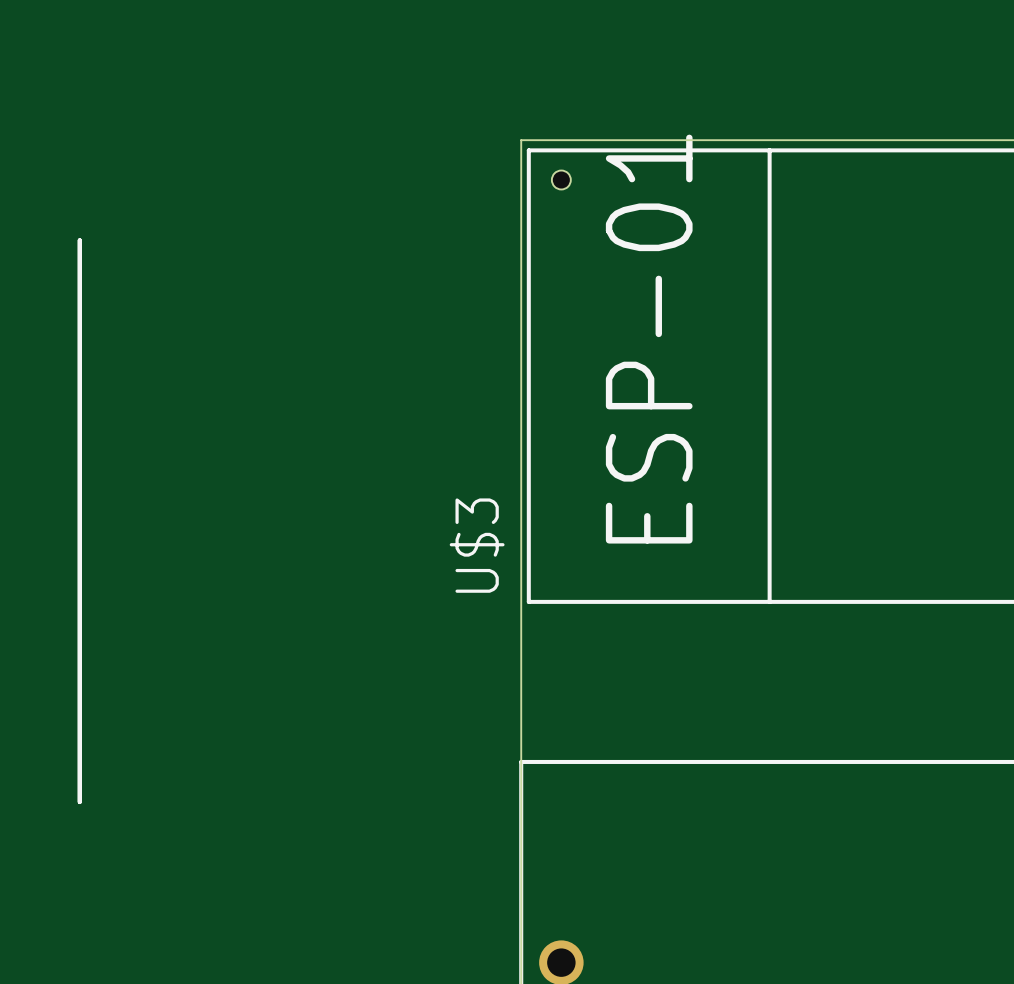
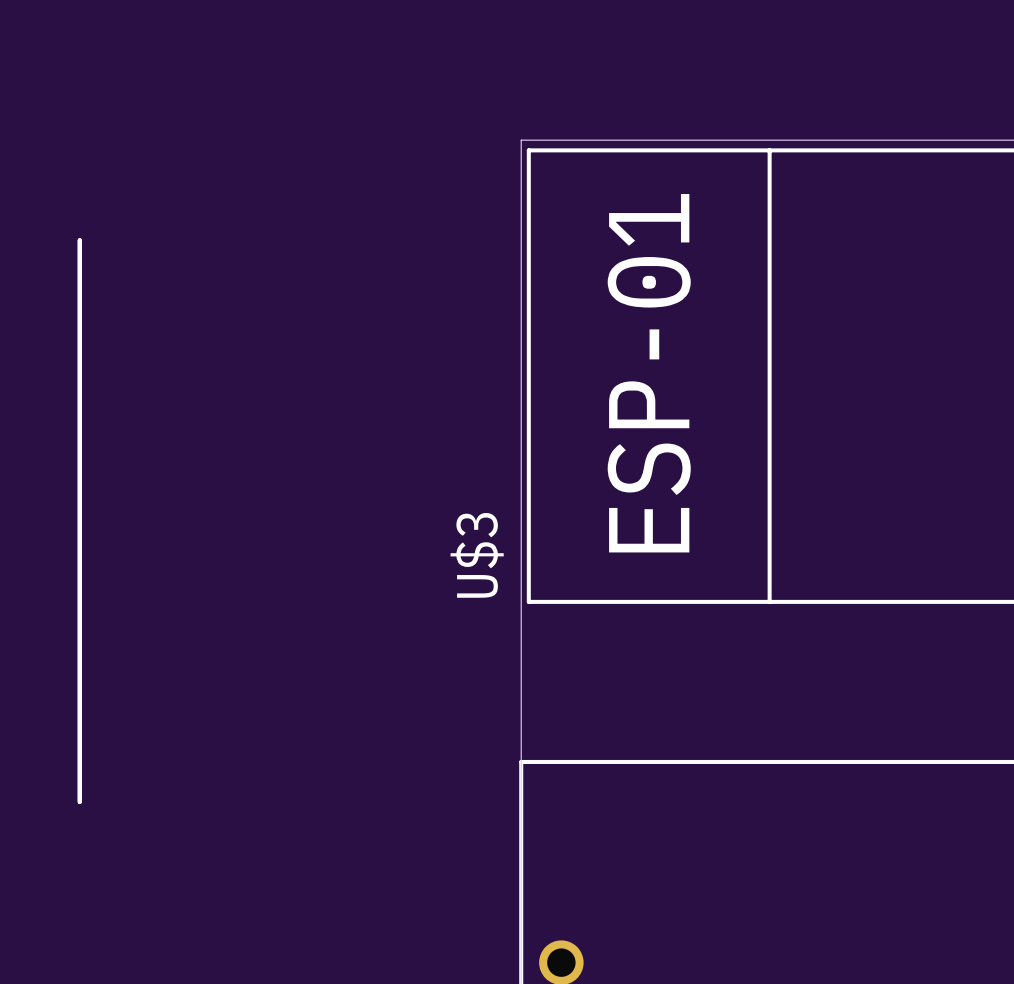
hole: (561, 180) -> none

